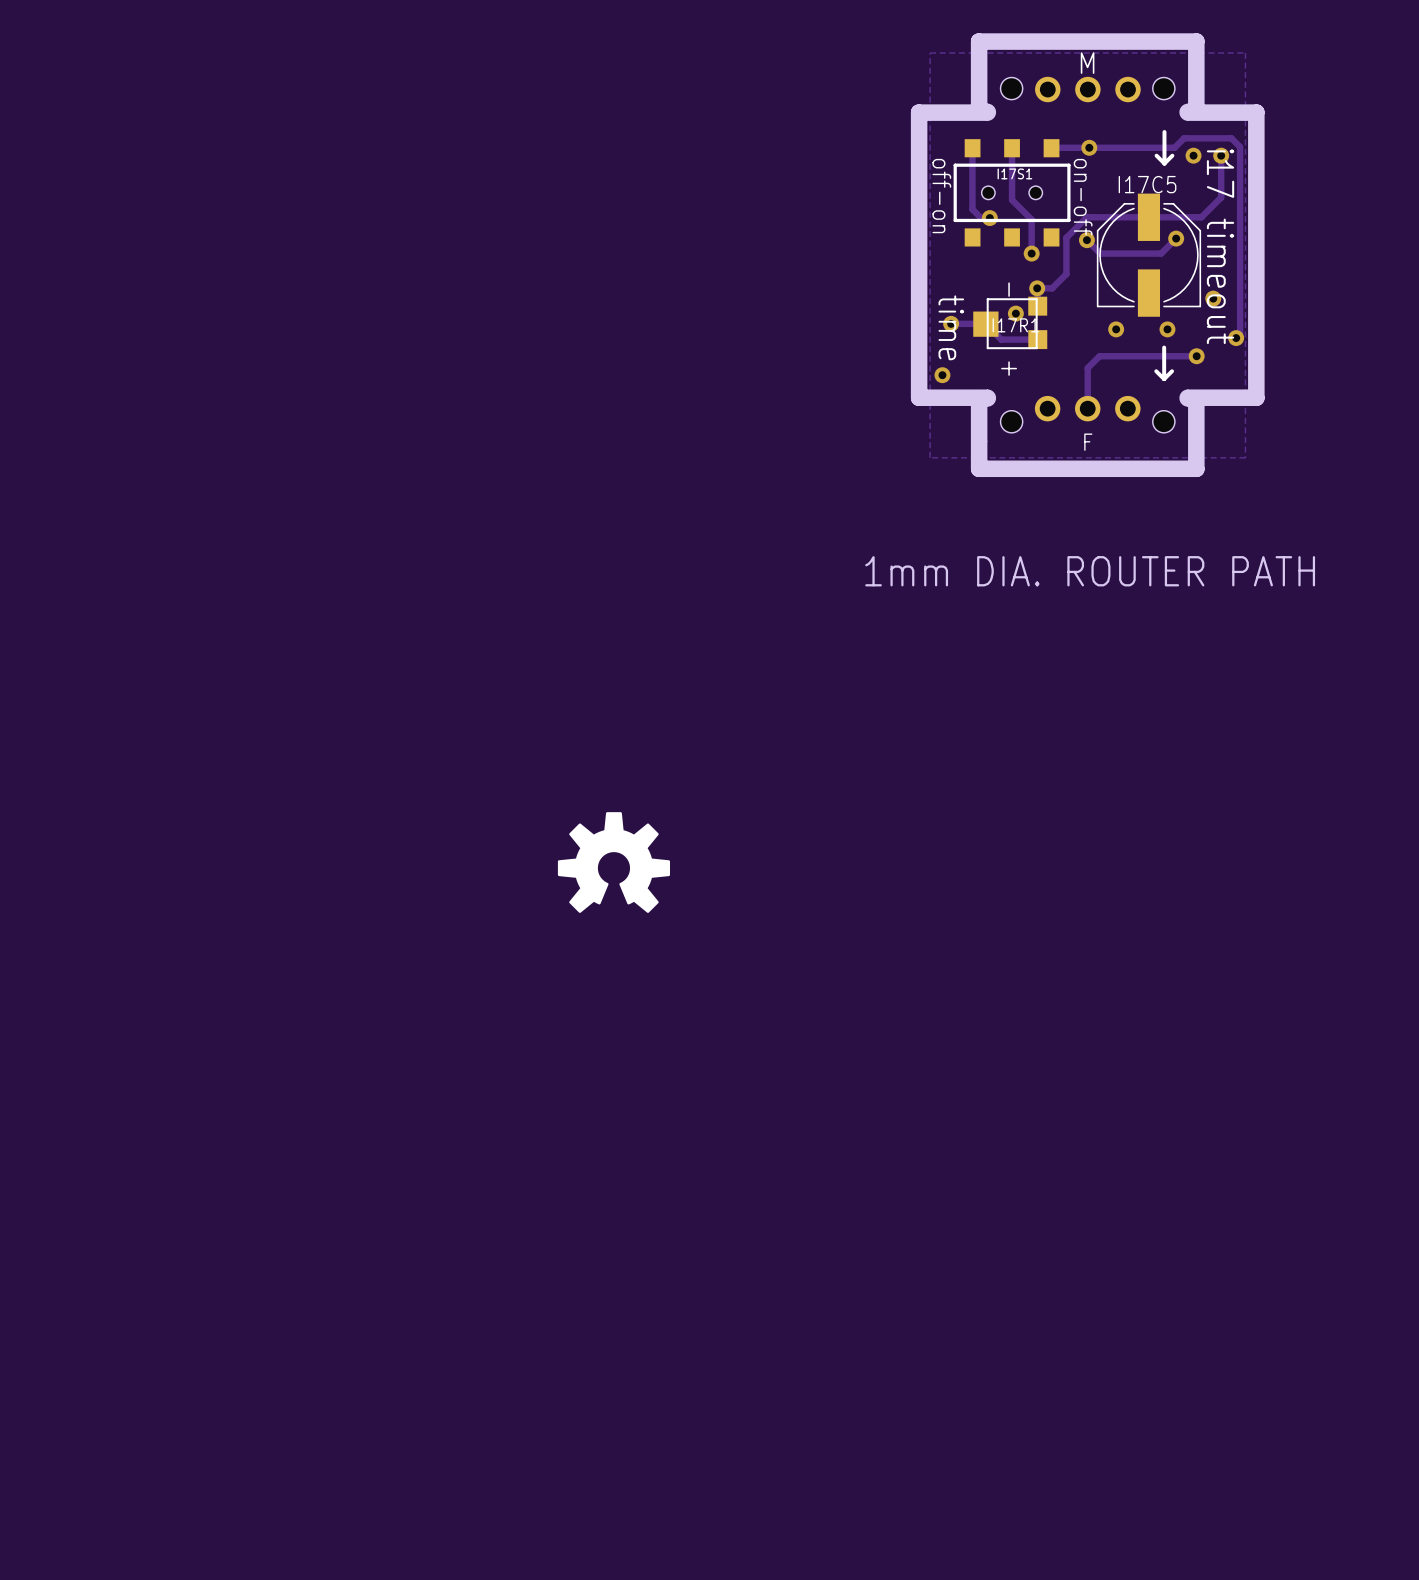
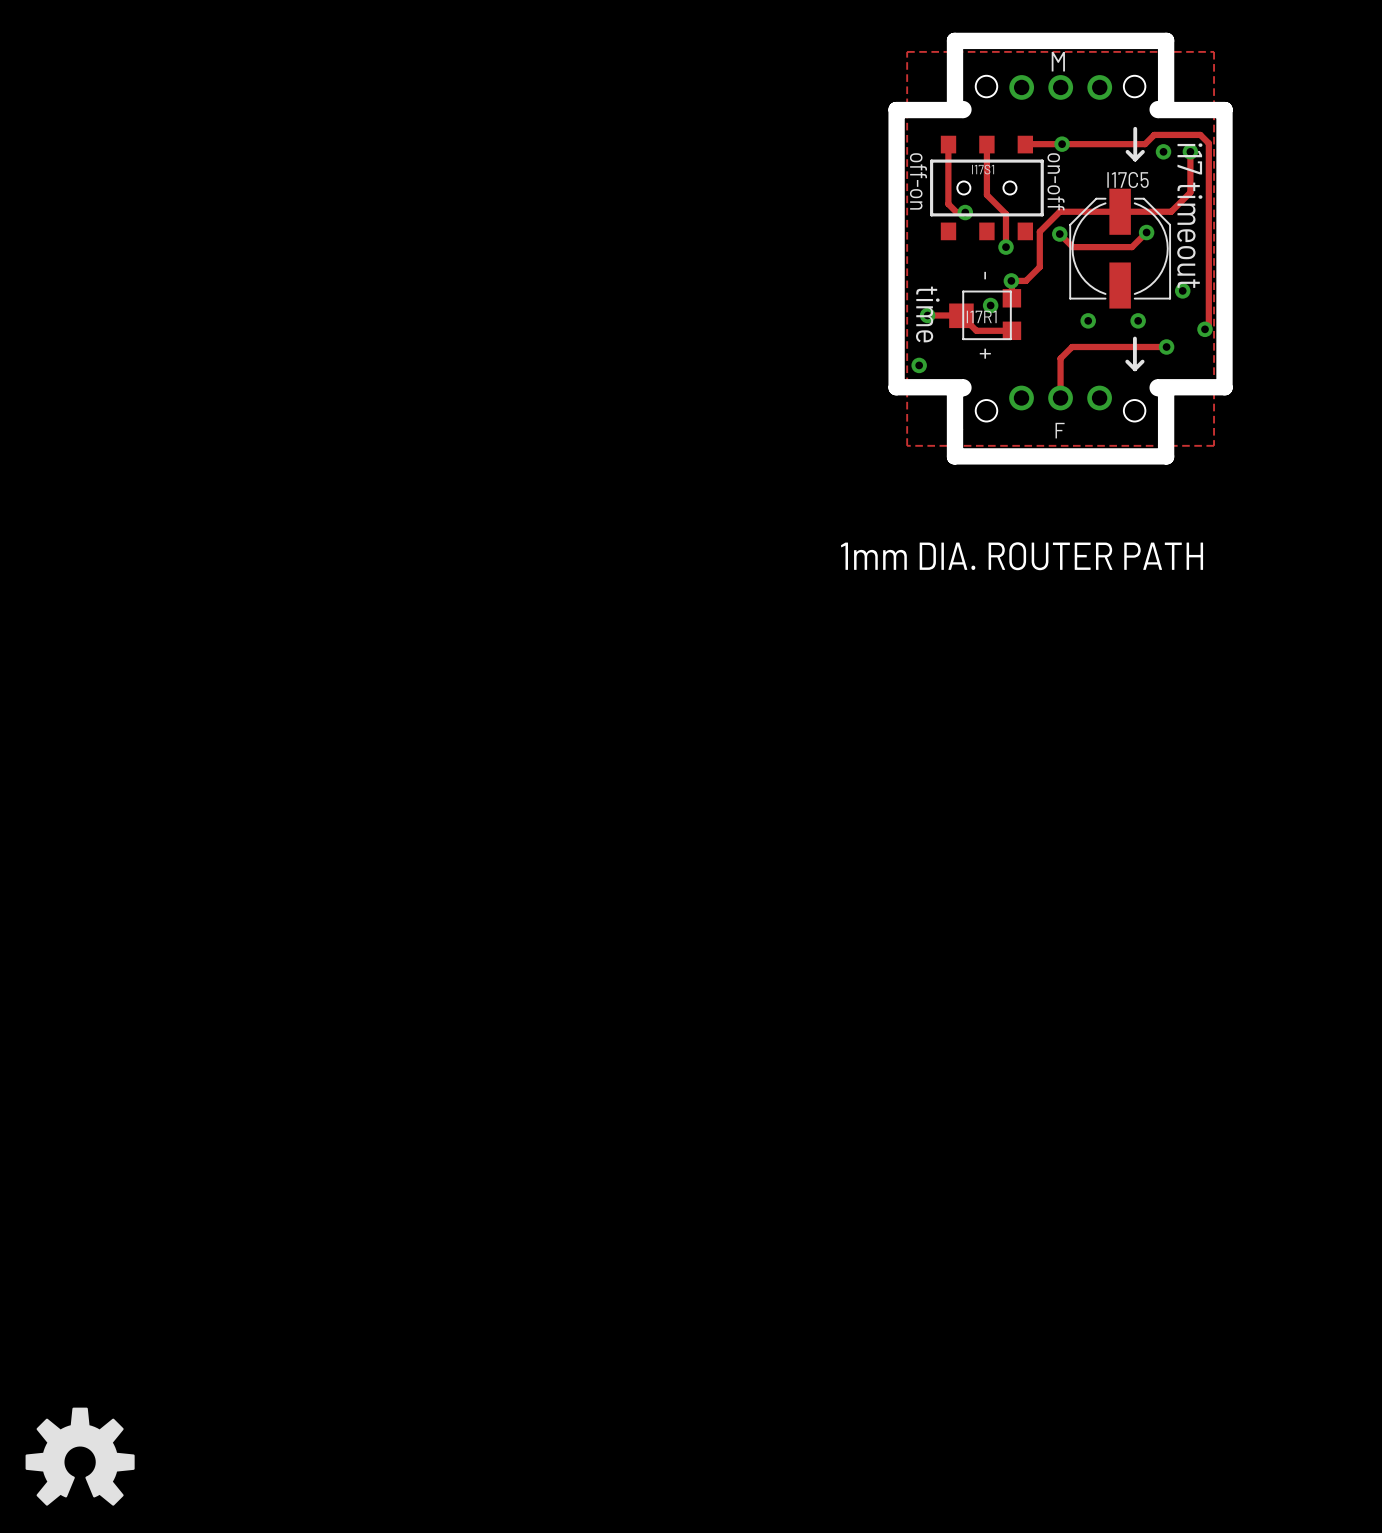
drawing: [557, 812, 670, 913] -> none
drawing: none -> [25, 1407, 135, 1506]

